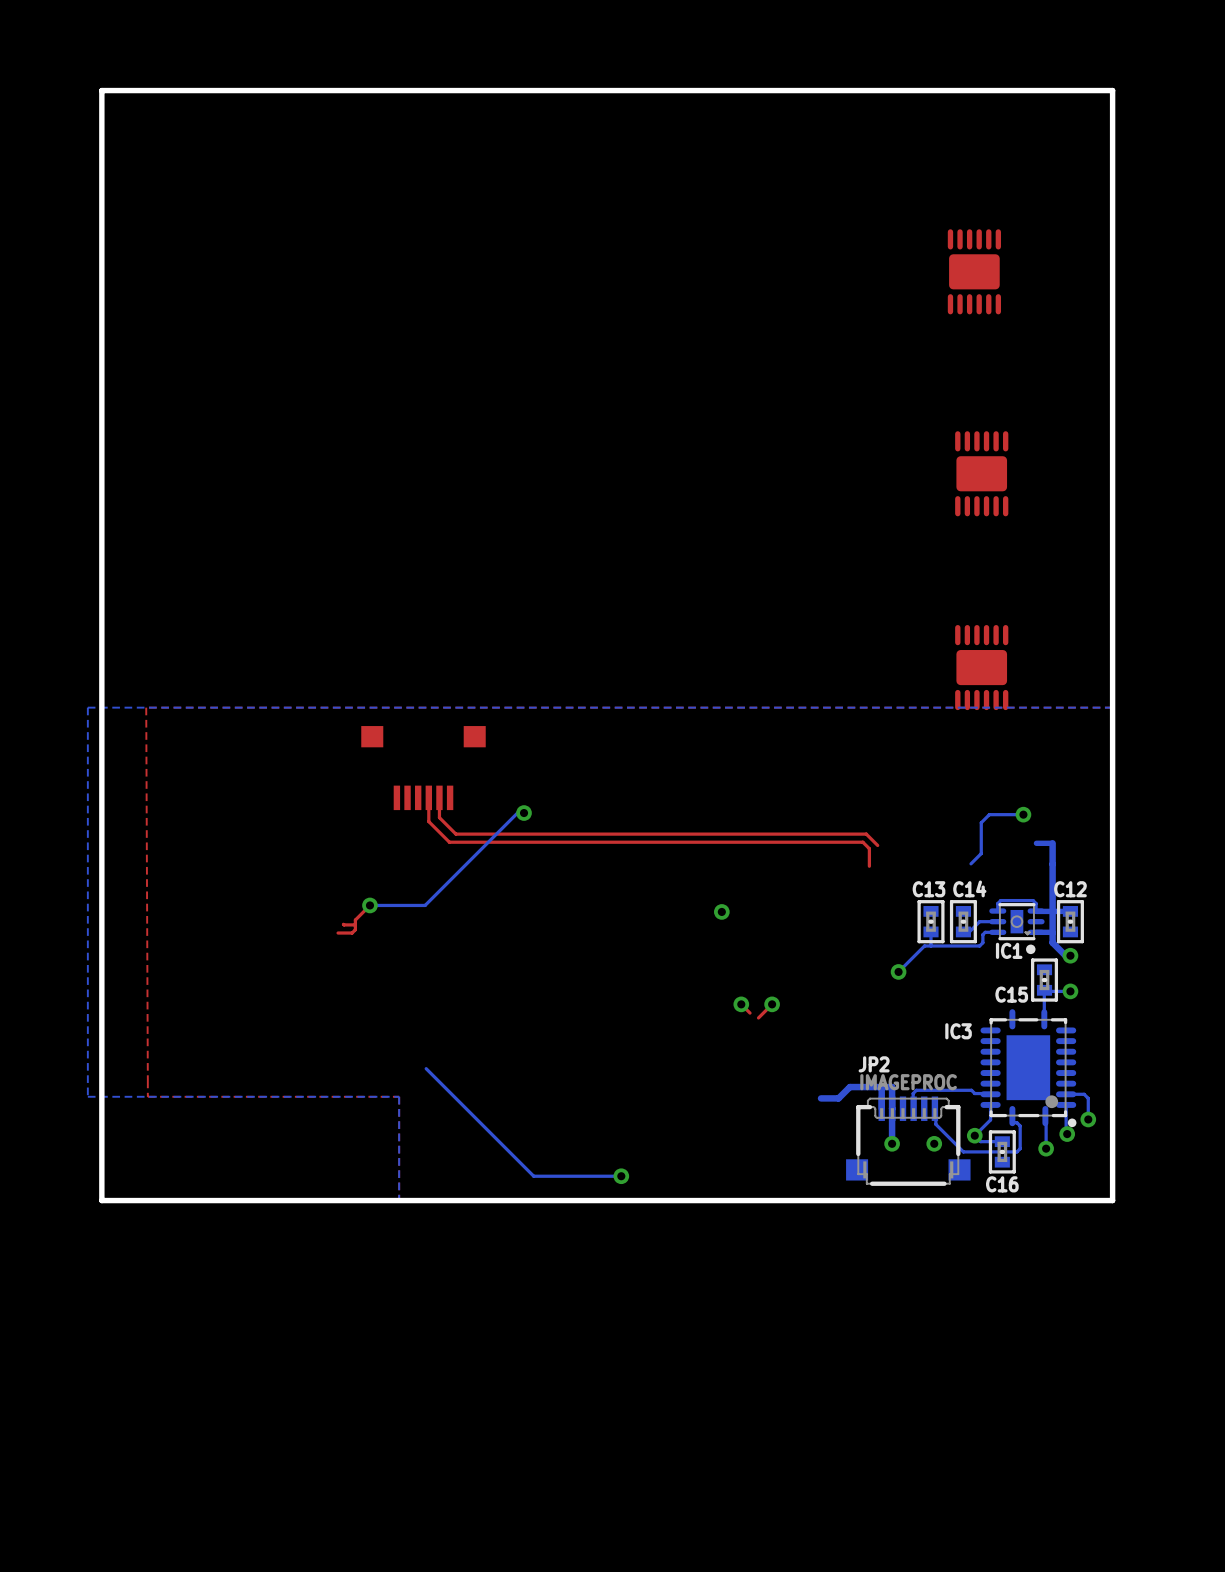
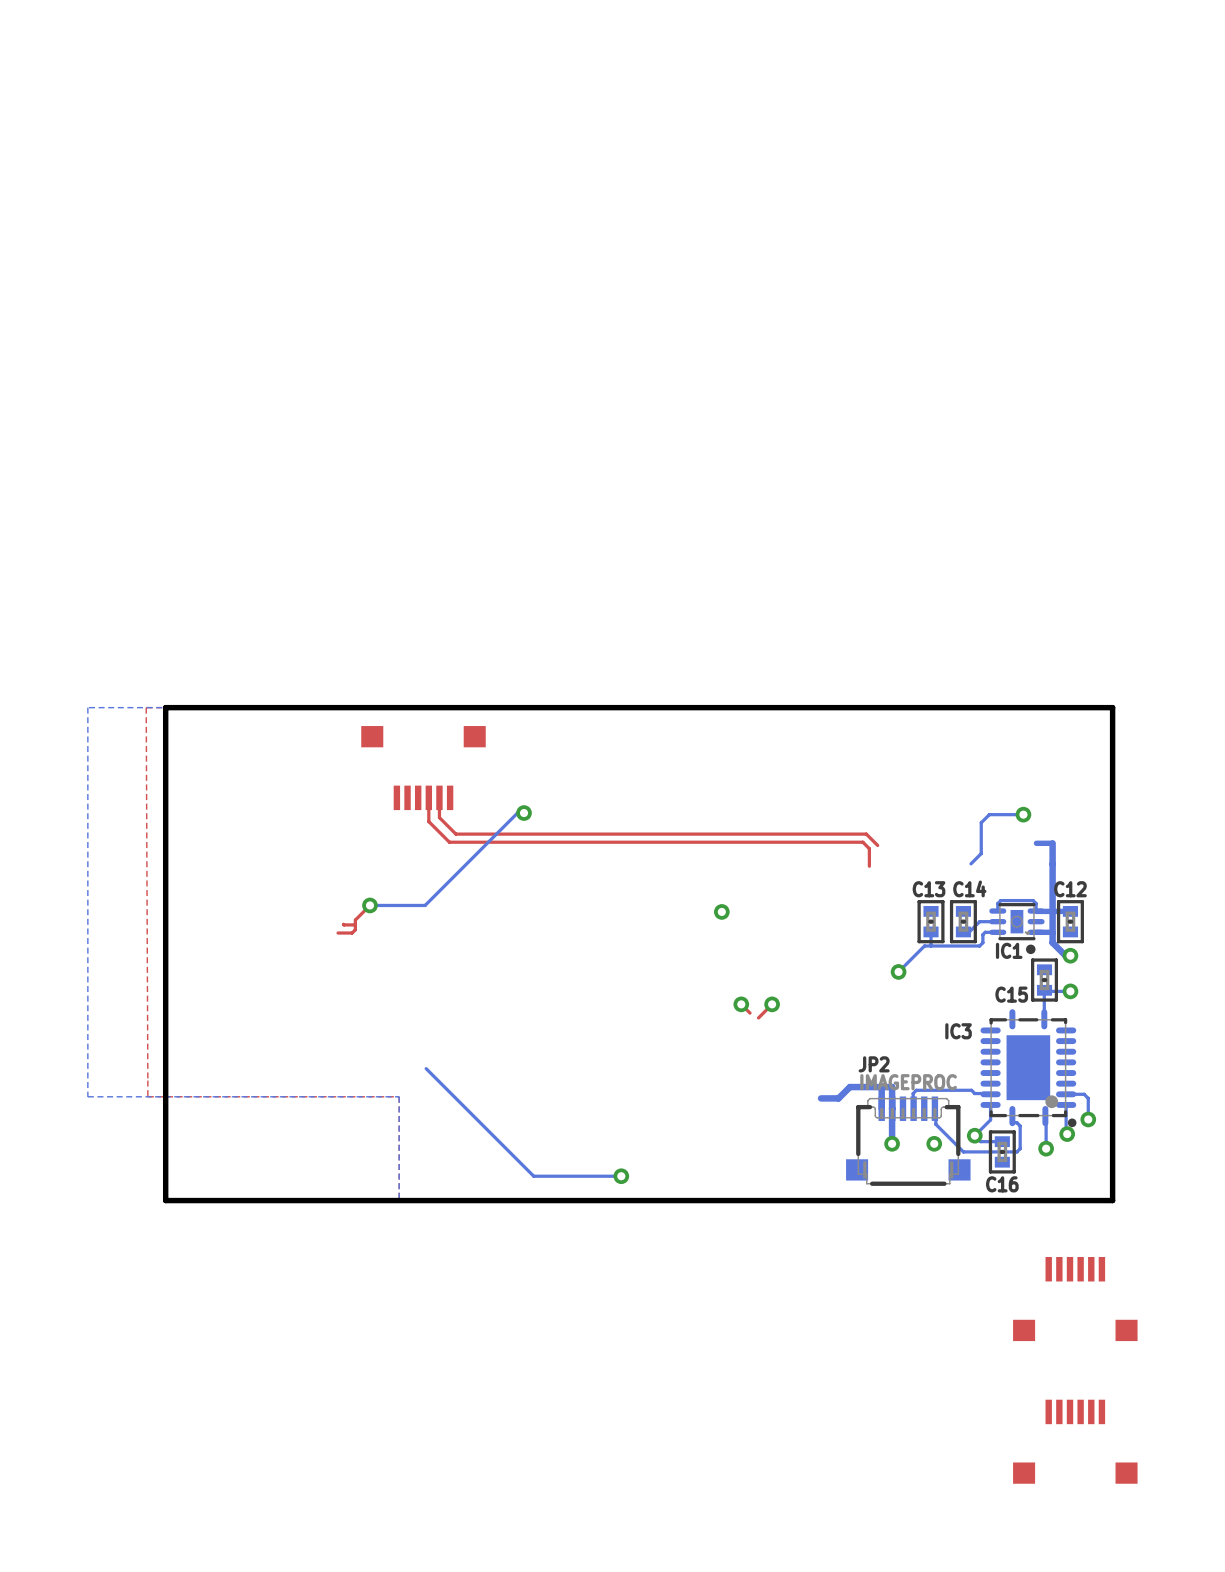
part: (974, 271) -> none
part: (981, 473) -> none
part: (981, 667) -> none
board edge: (1112, 707) (1112, 90) (101, 90) (101, 1200) (165, 1200) -> (1112, 707) (165, 707) (165, 1200)
part: none -> (1075, 1299)
part: none -> (1075, 1441)

